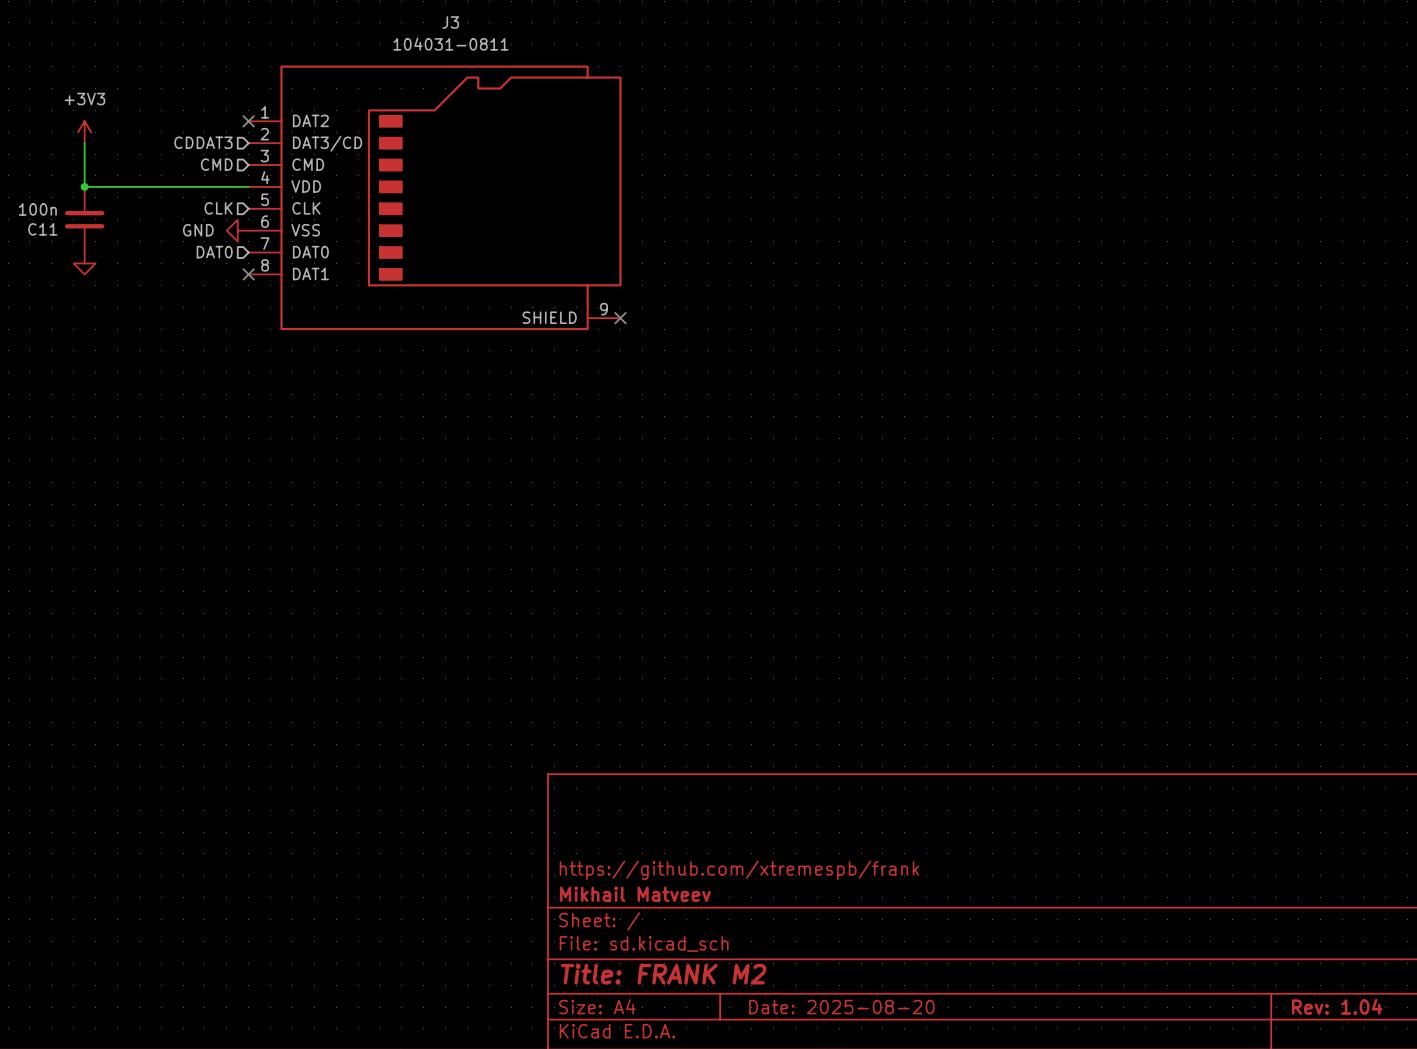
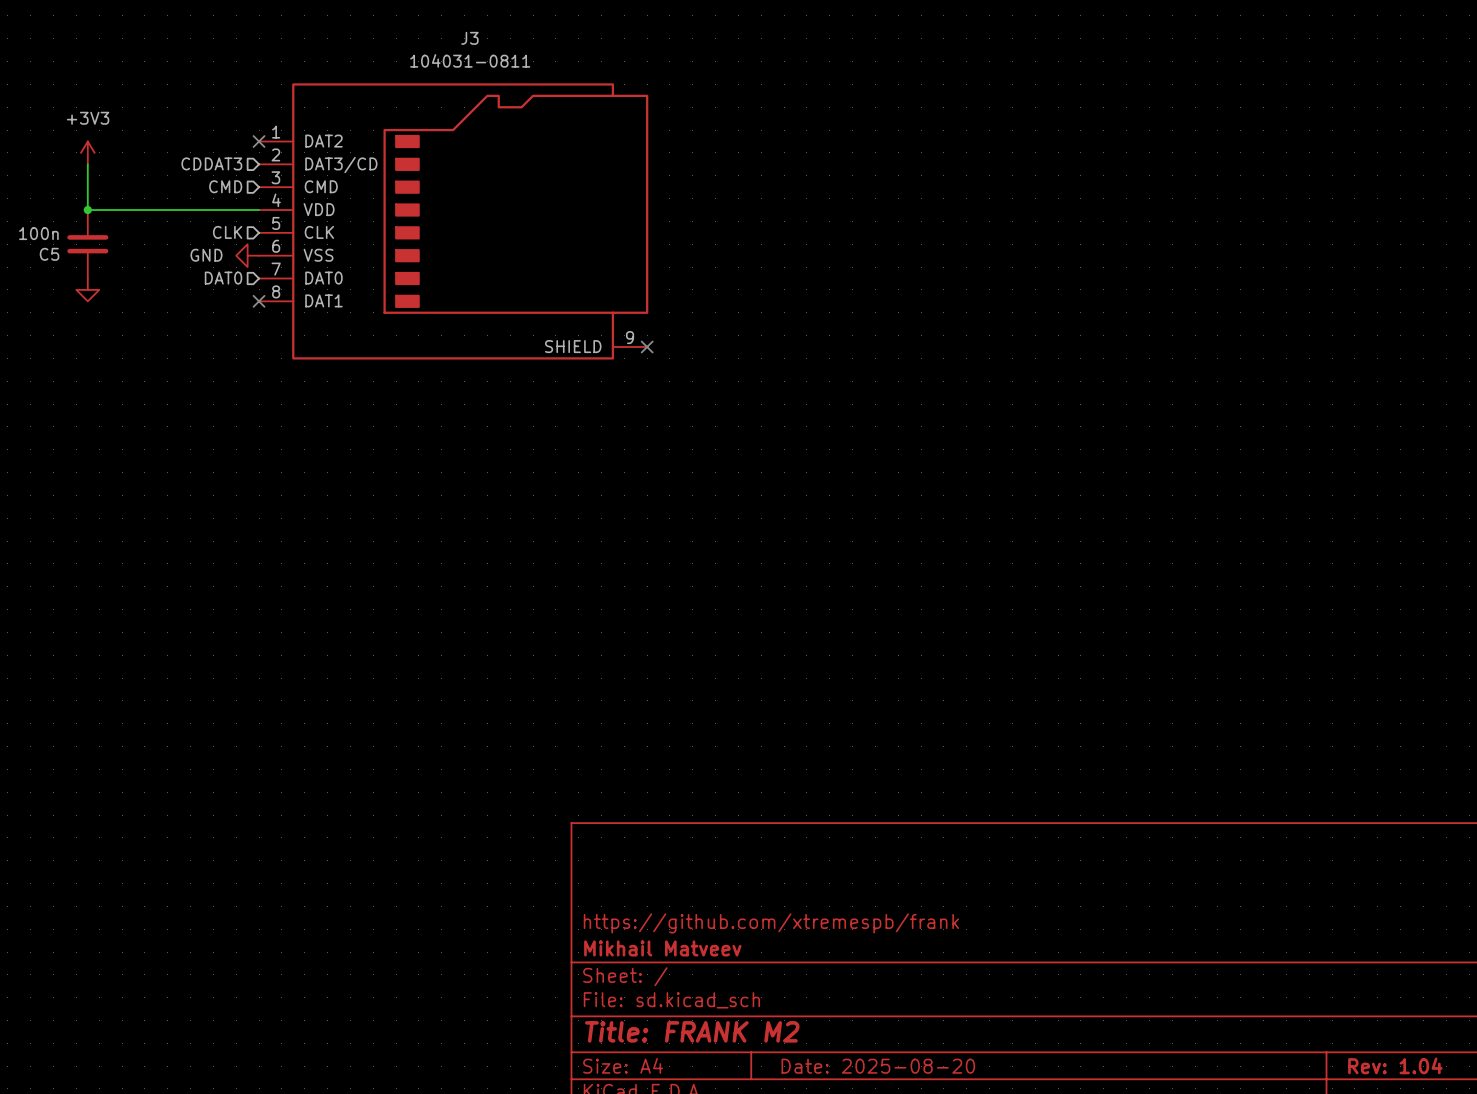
C11 name: C11 (42, 229) -> C5 (49, 254)

